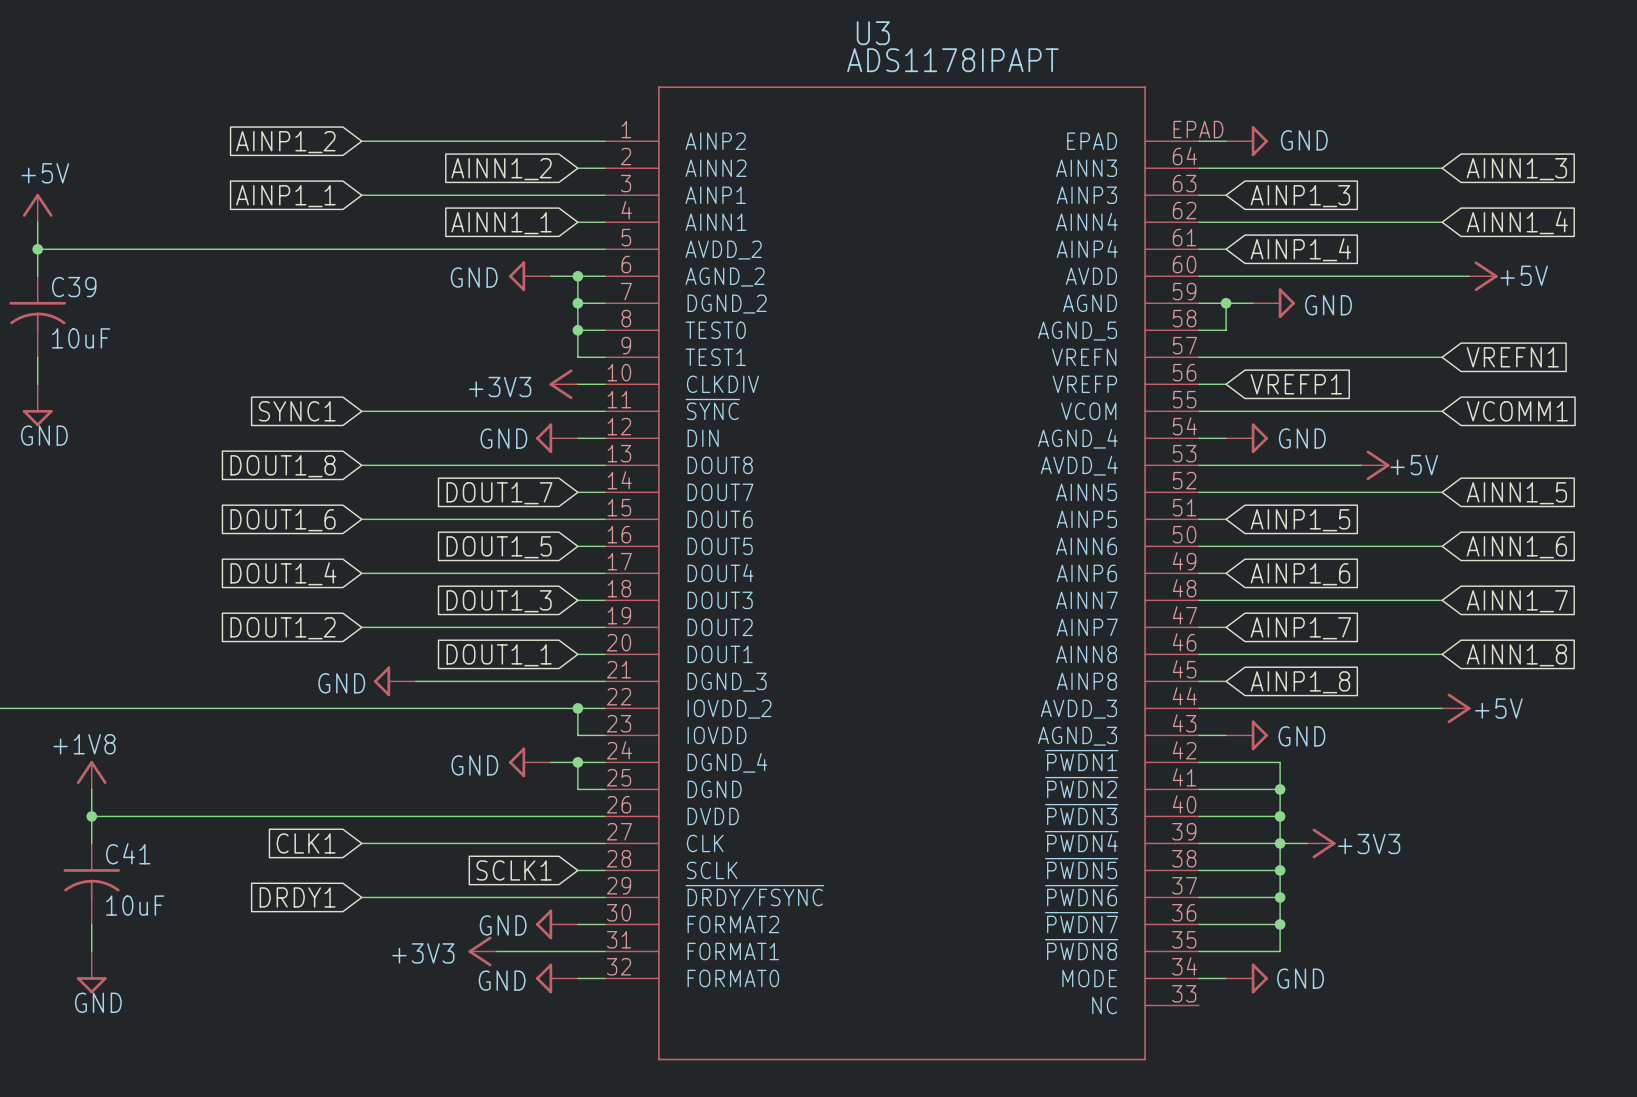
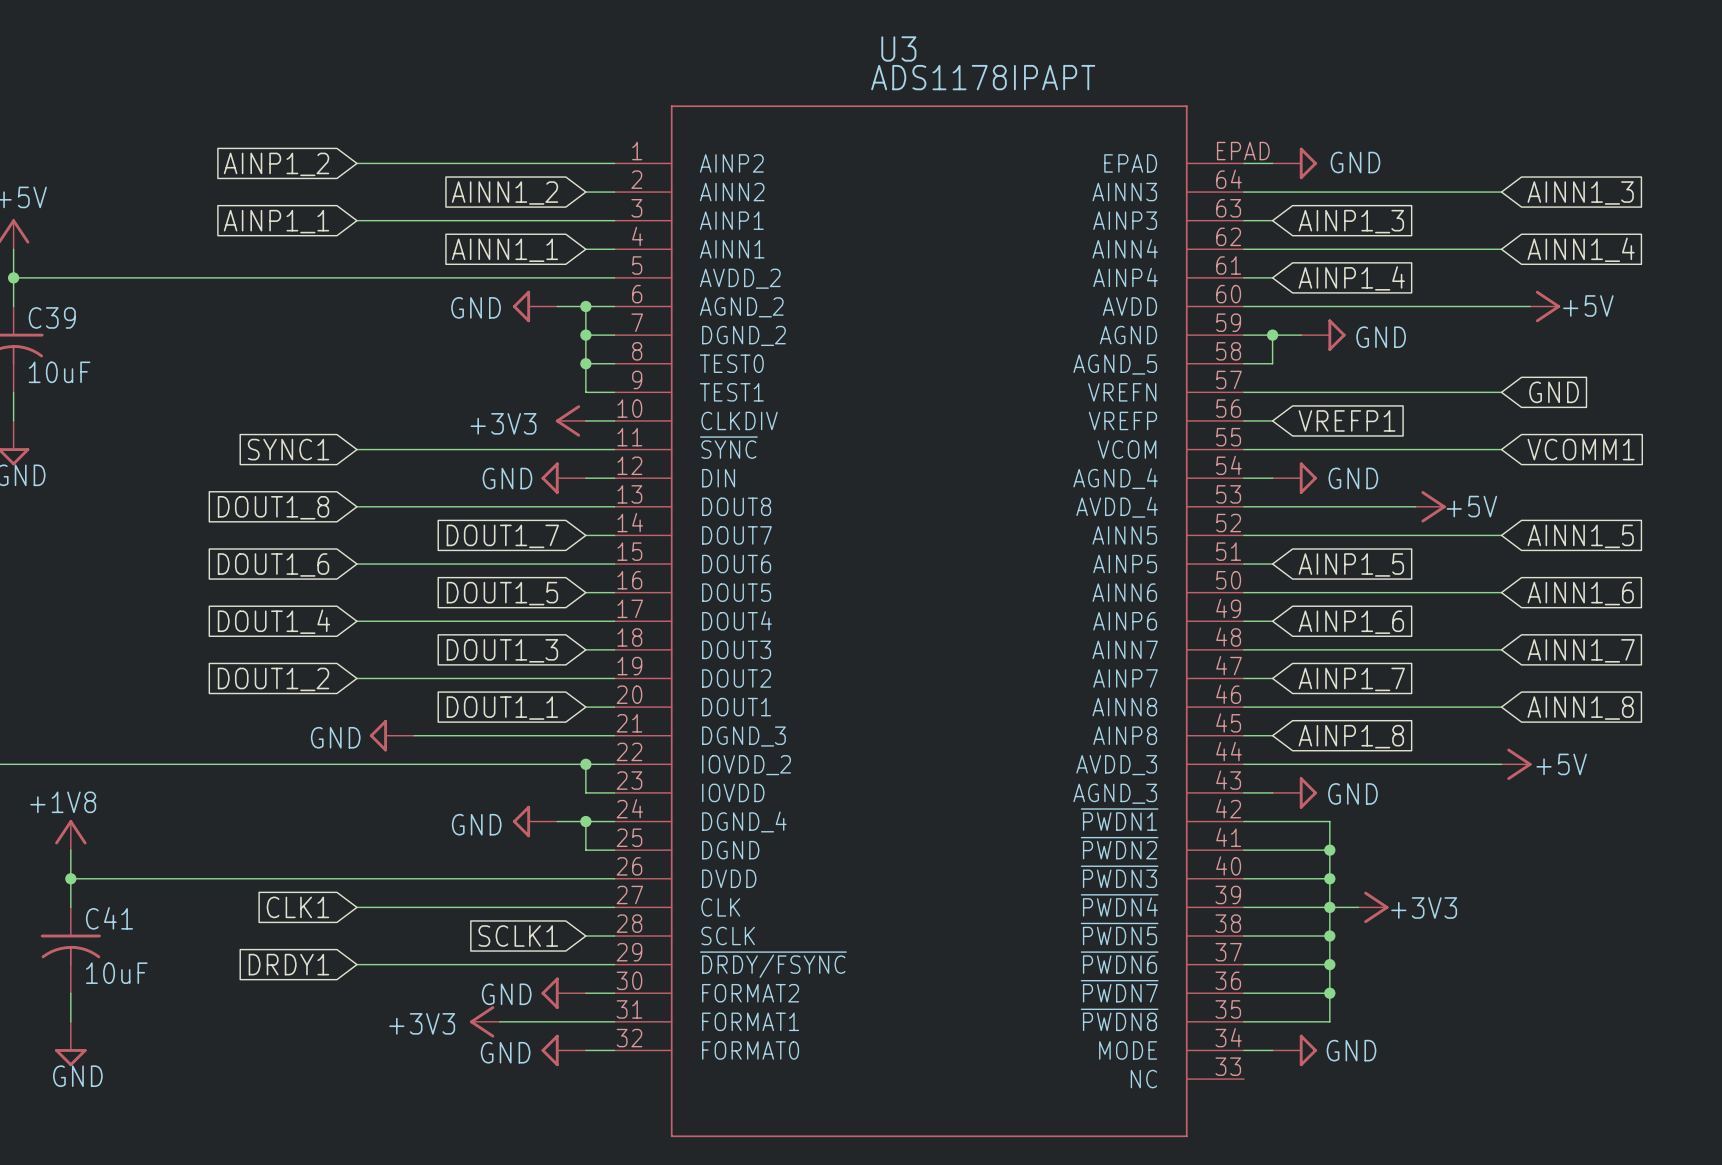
global label: VREFN1 (1512, 357) -> GND (1554, 392)

